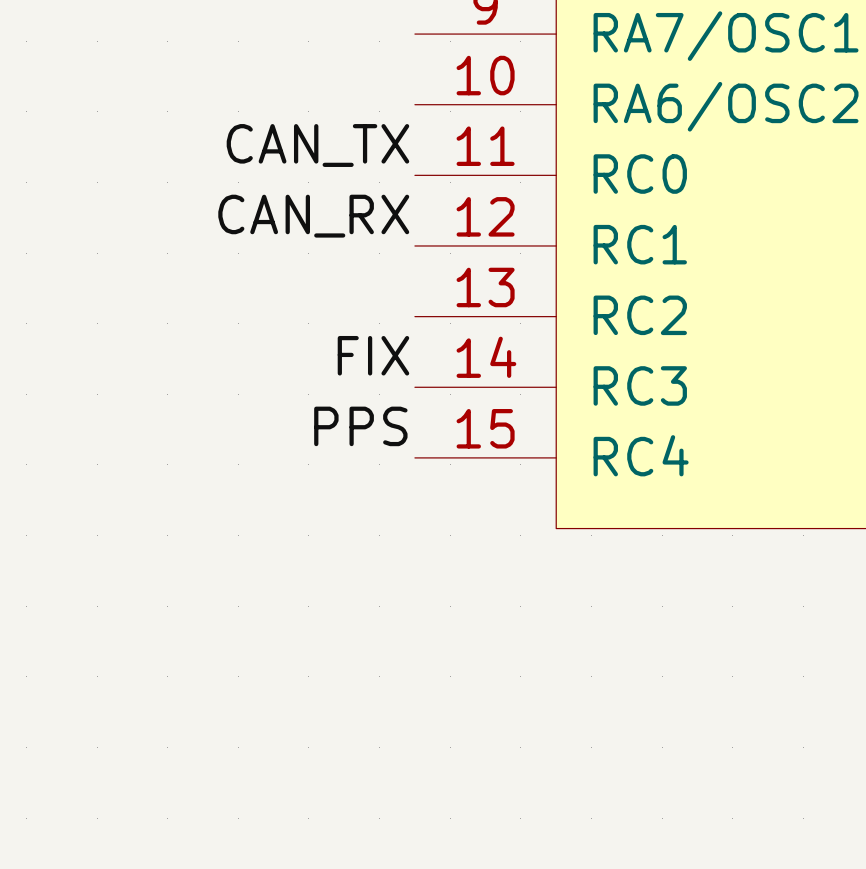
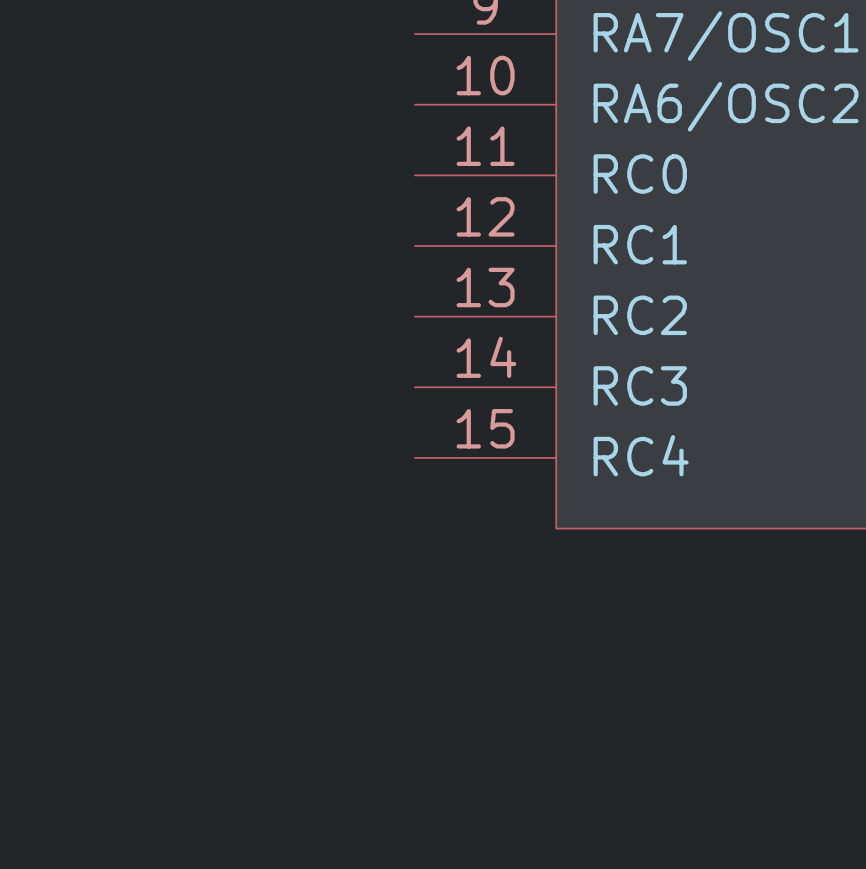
label: CAN_TX (317, 145) -> none
label: CAN_RX (313, 216) -> none
label: FIX (373, 355) -> none
label: PPS (360, 426) -> none

